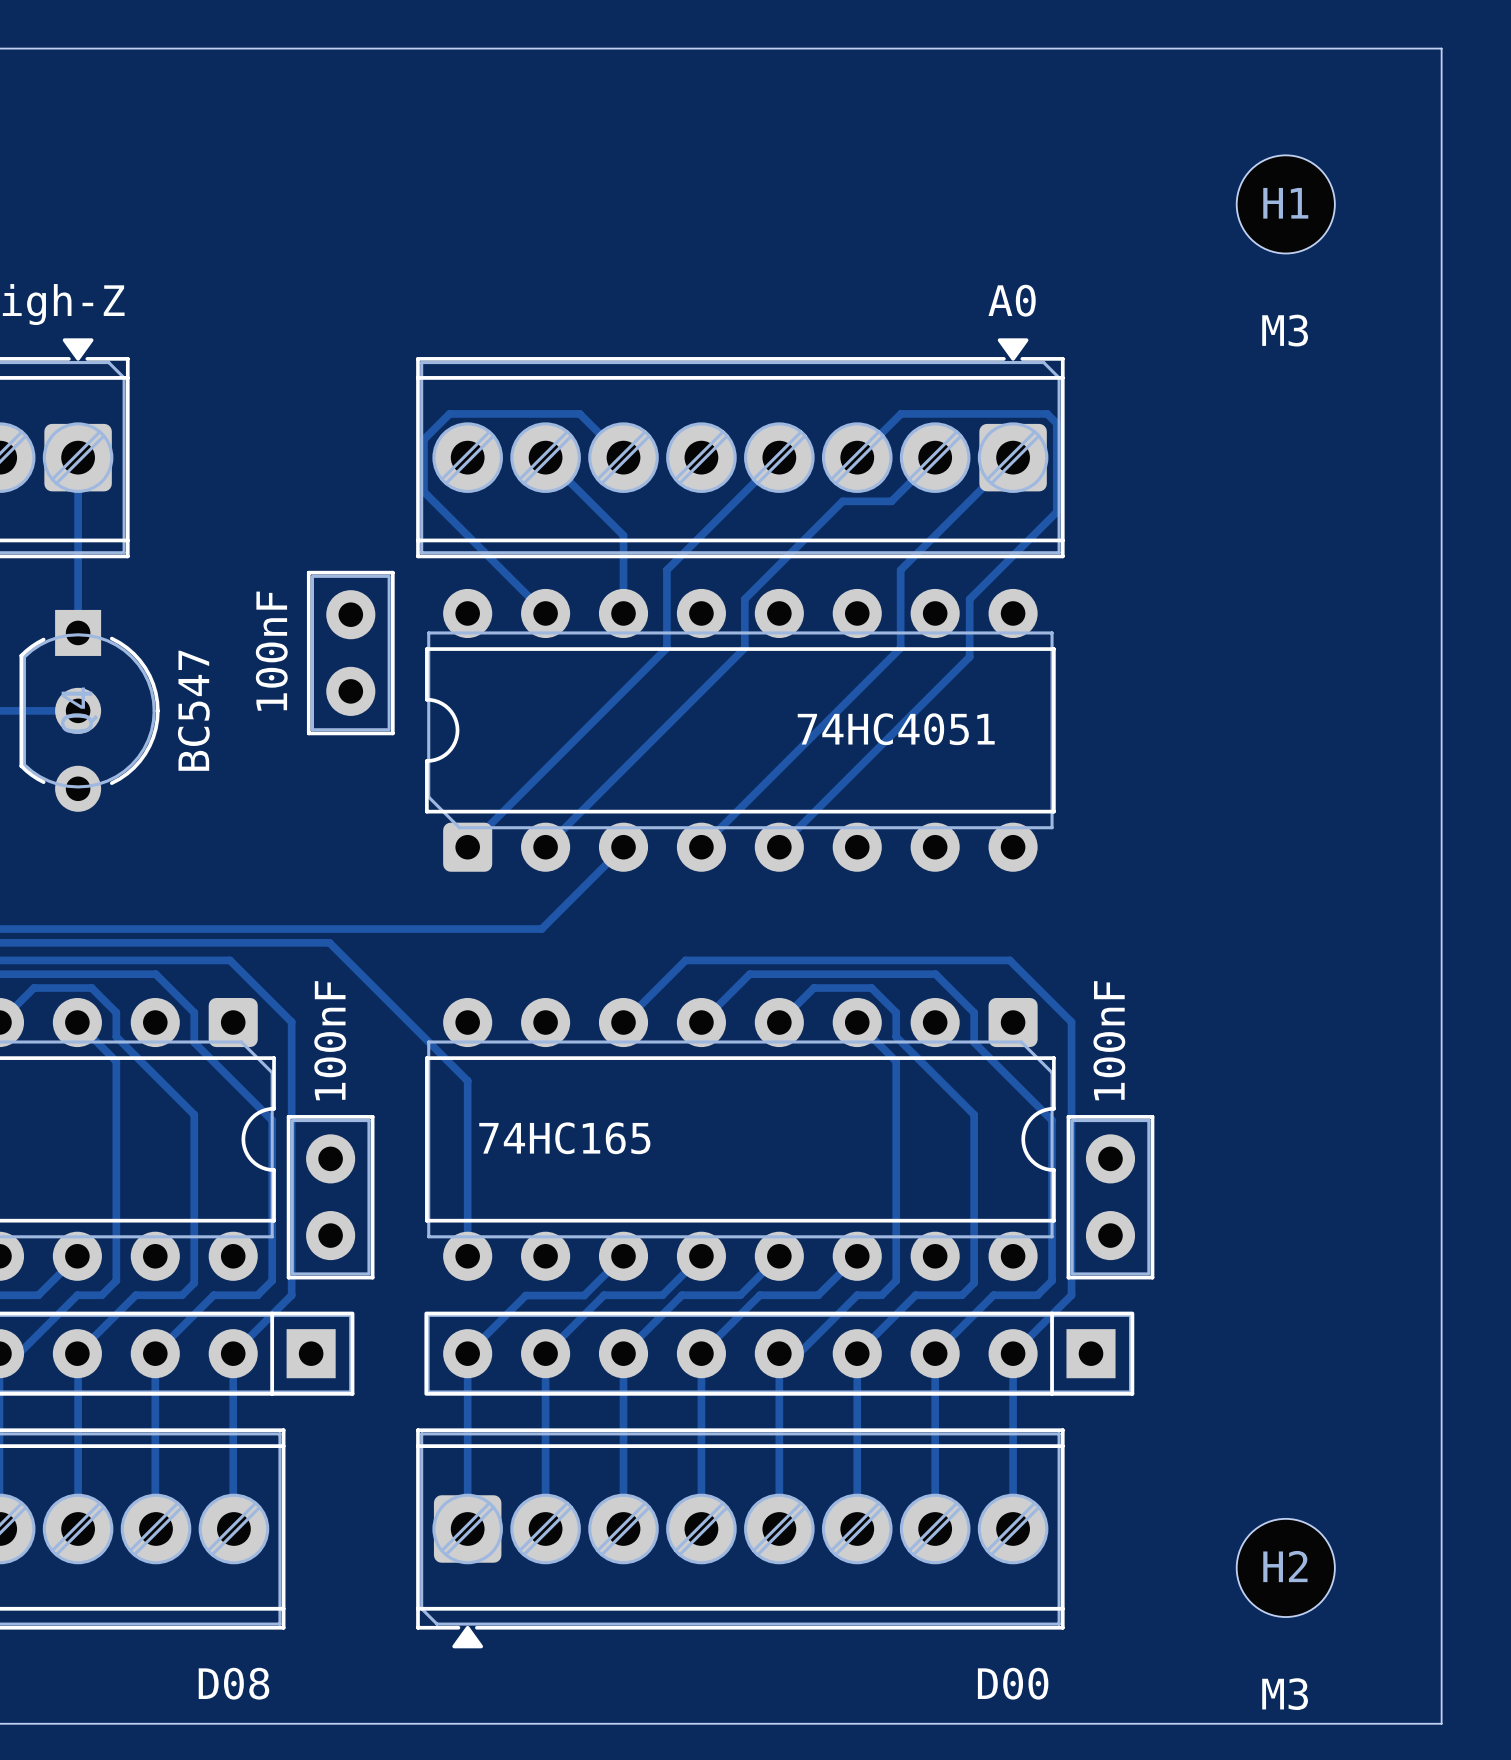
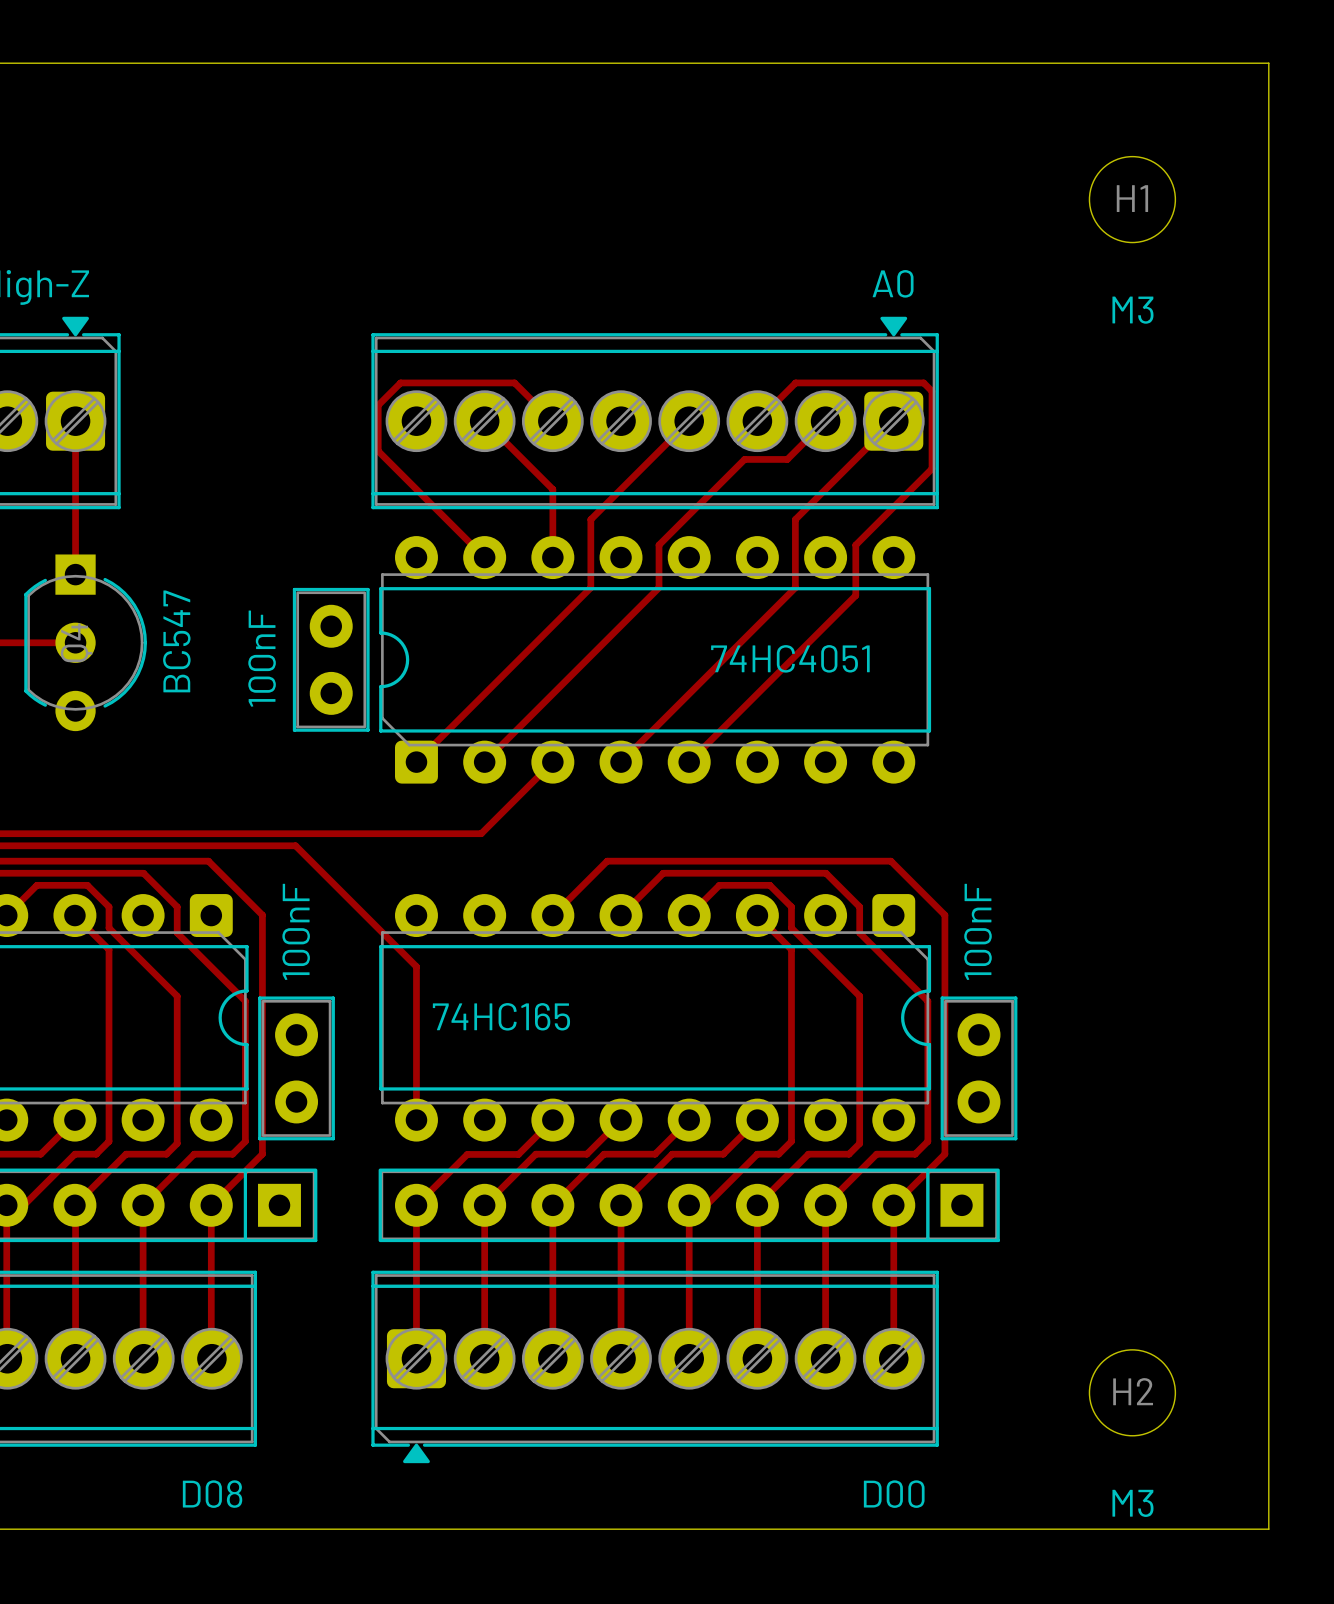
part position: (350, 653) -> (331, 659)

